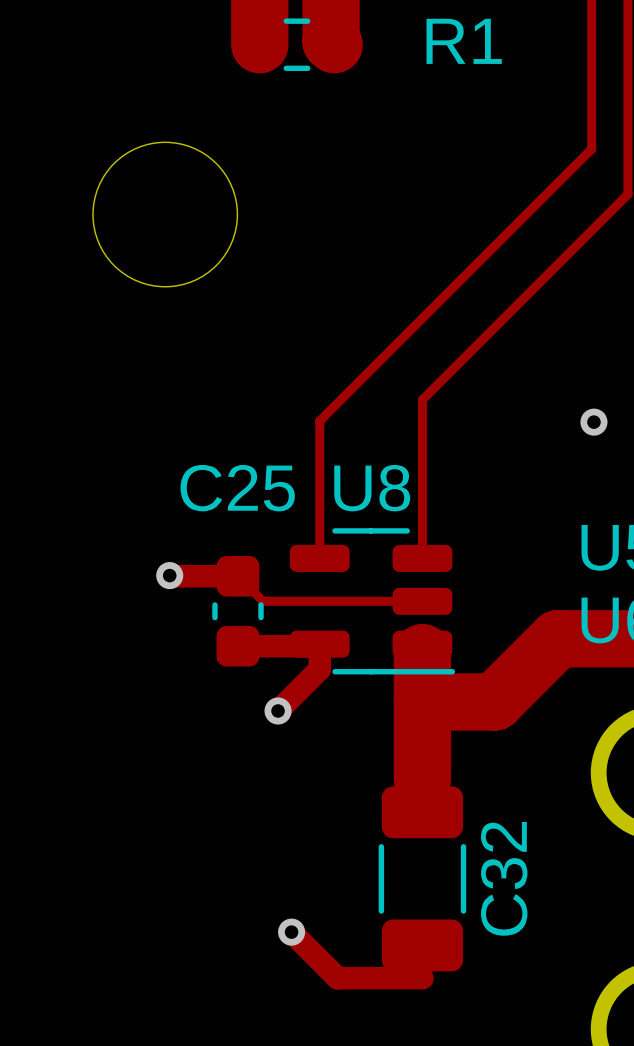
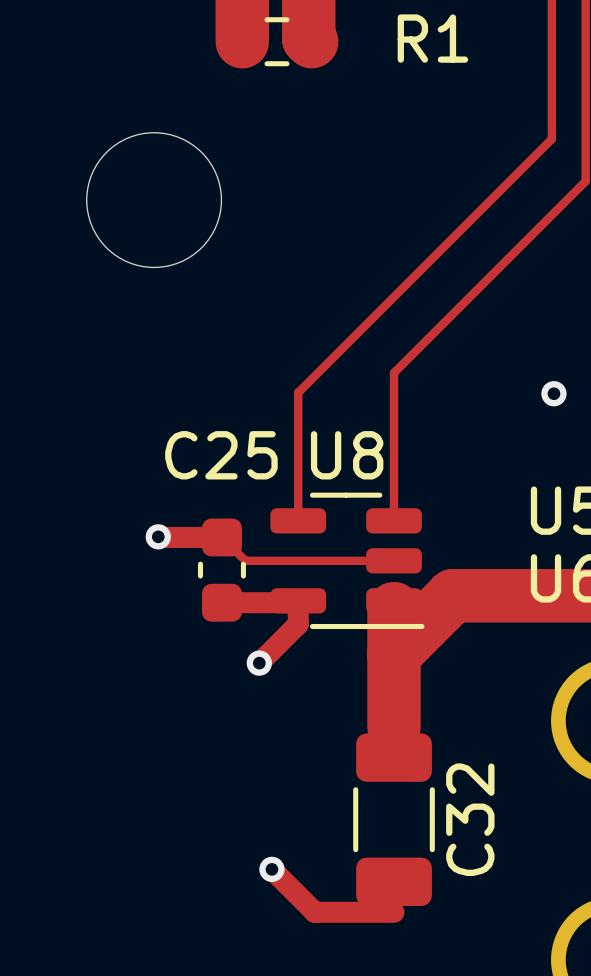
track: (557, 638) (494, 701) (422, 701) -> (520, 595) (452, 595) (394, 654)

